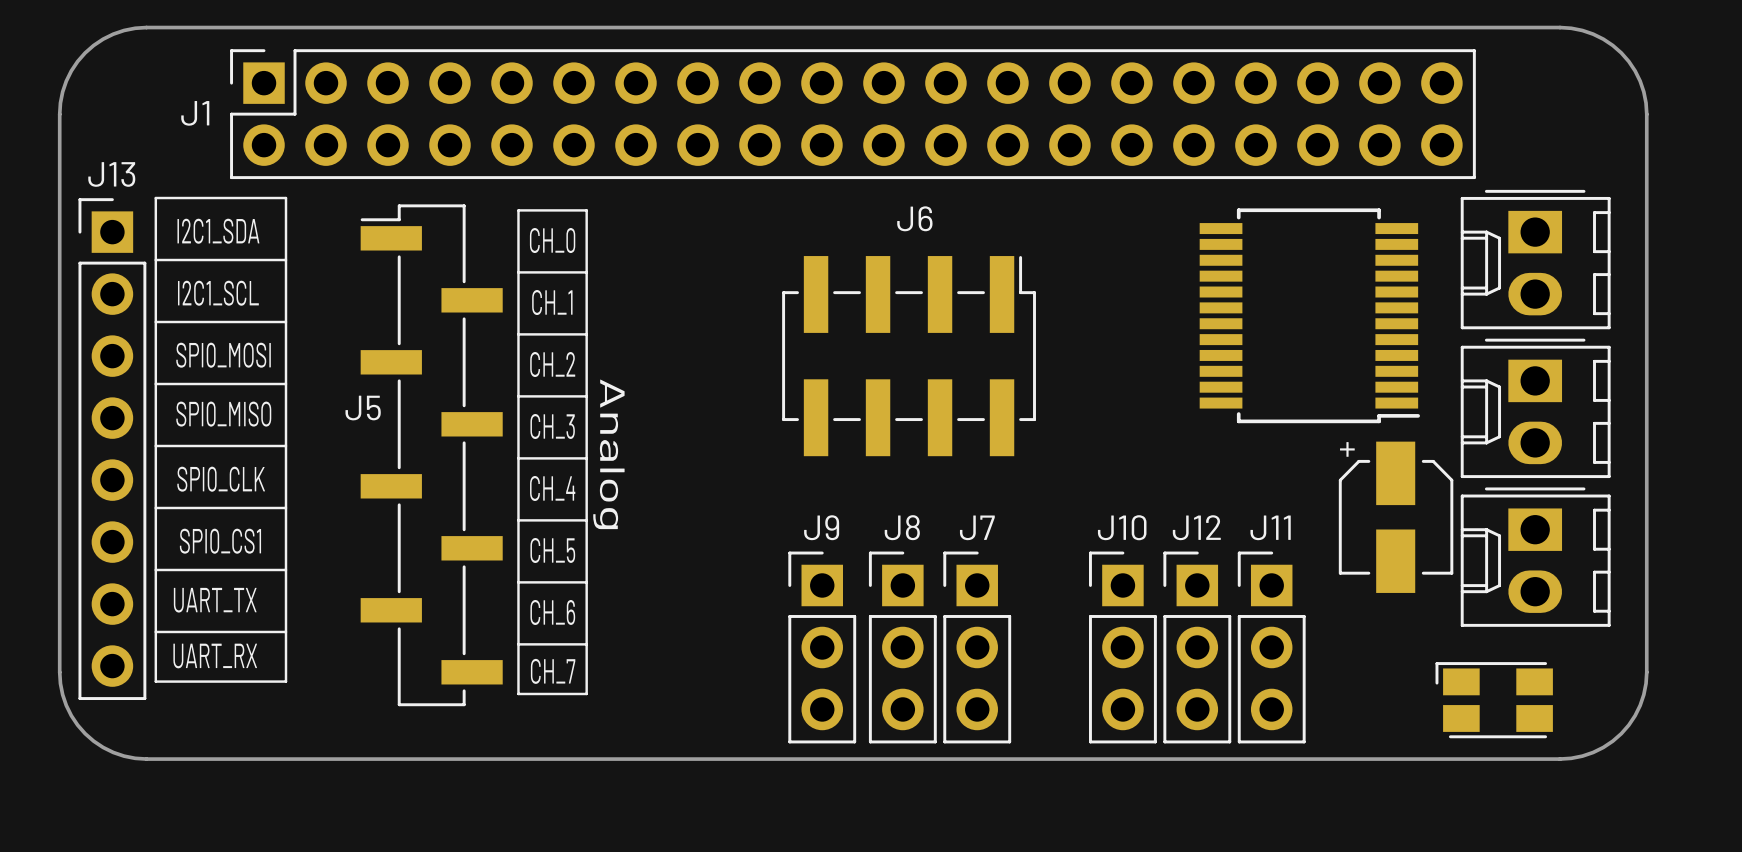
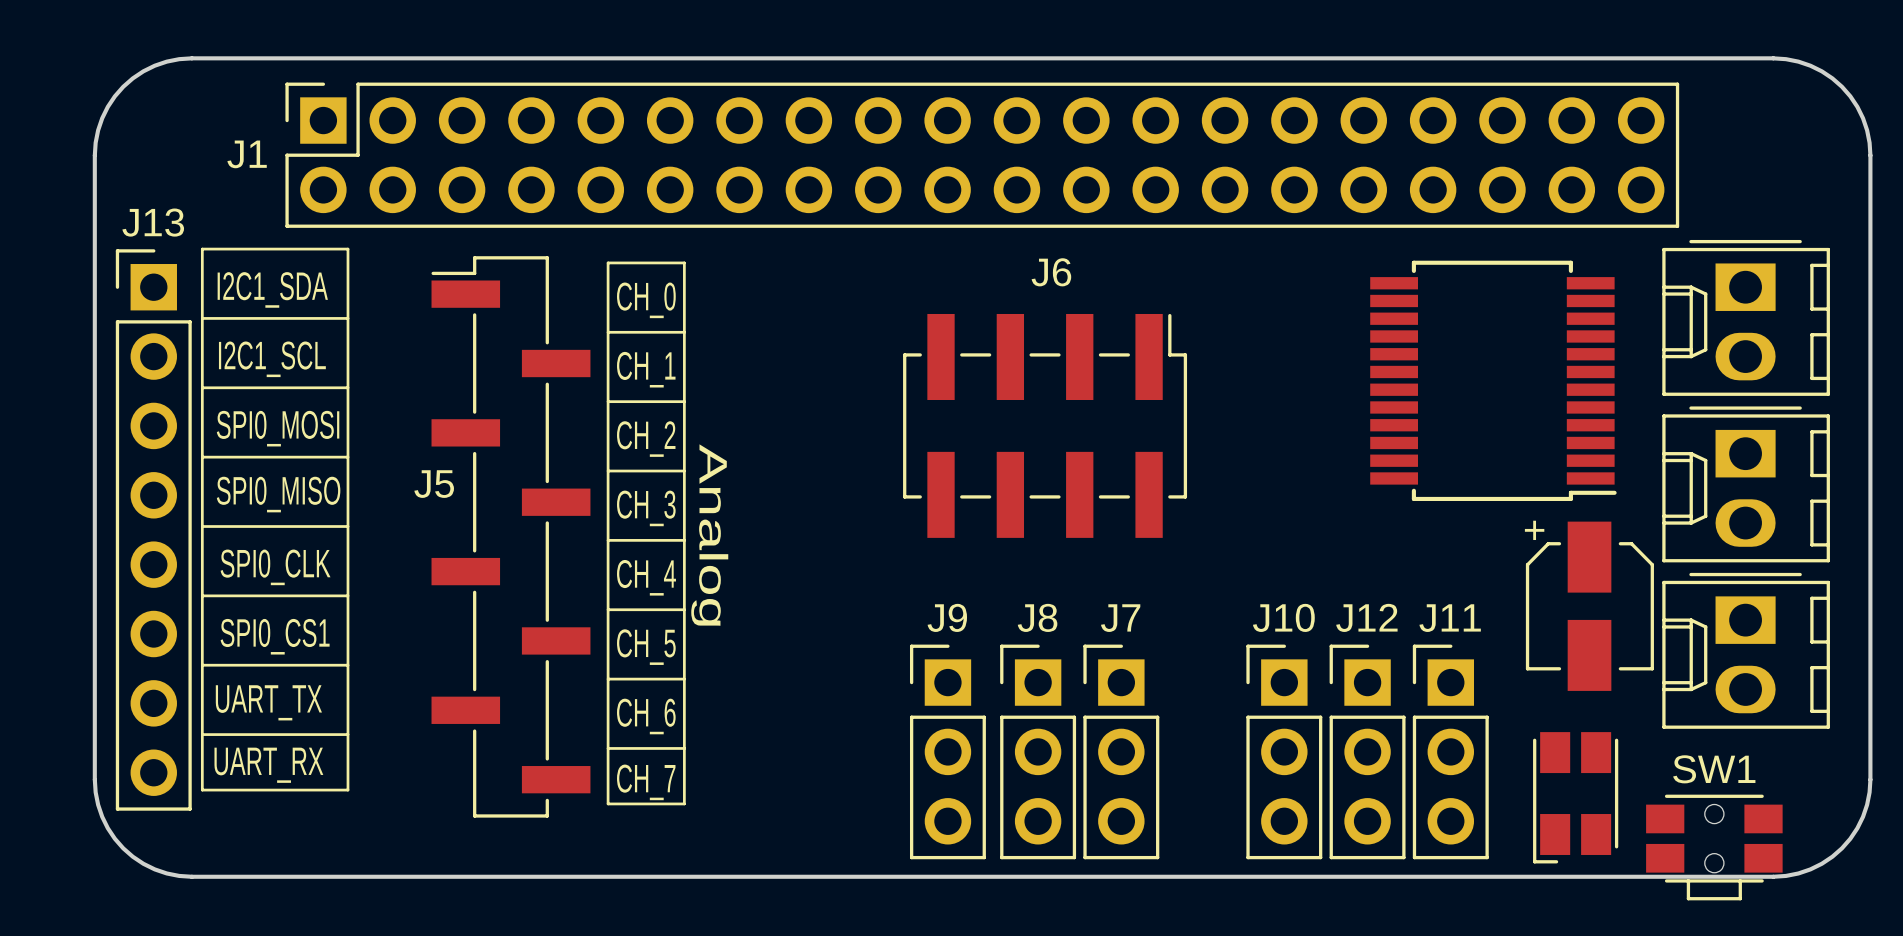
part rotation: 0° (1494, 700) -> 90° counterclockwise (1575, 797)
part position: (1494, 700) -> (1575, 797)
SW1: none -> (1714, 847)

